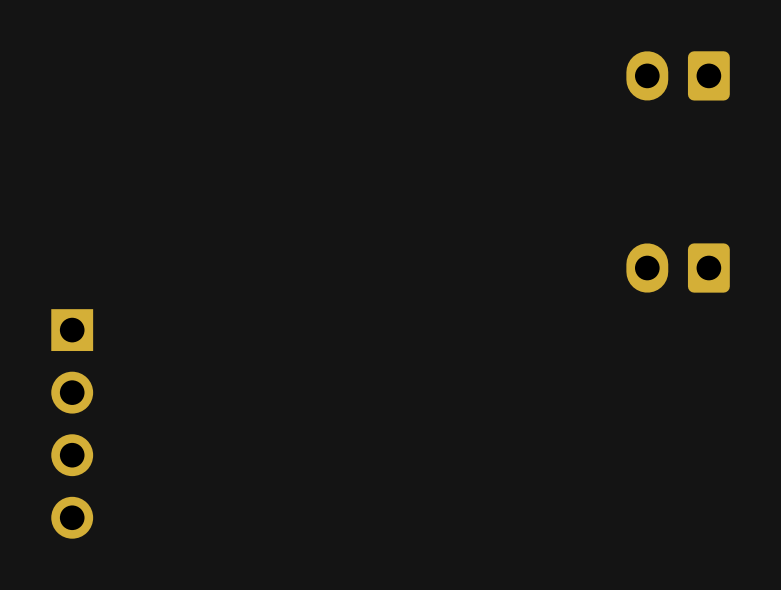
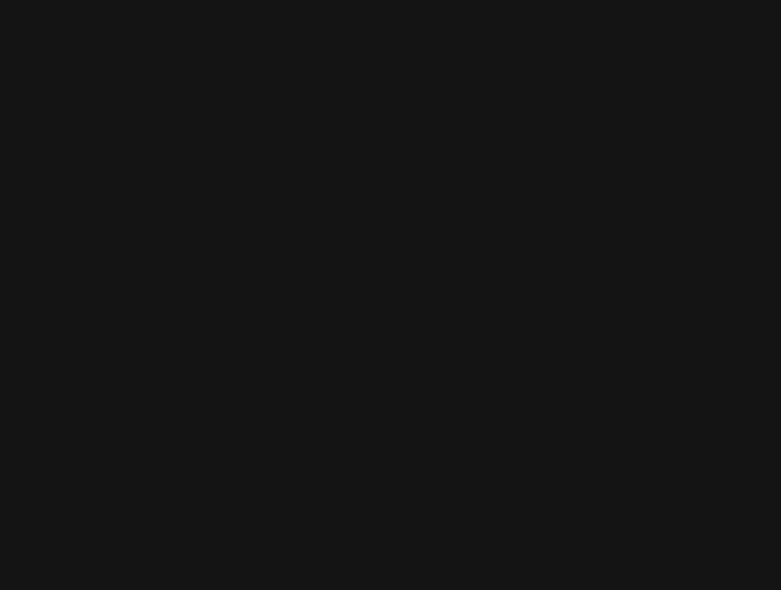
part: (678, 75) -> none
part: (678, 268) -> none
part: (72, 423) -> none

